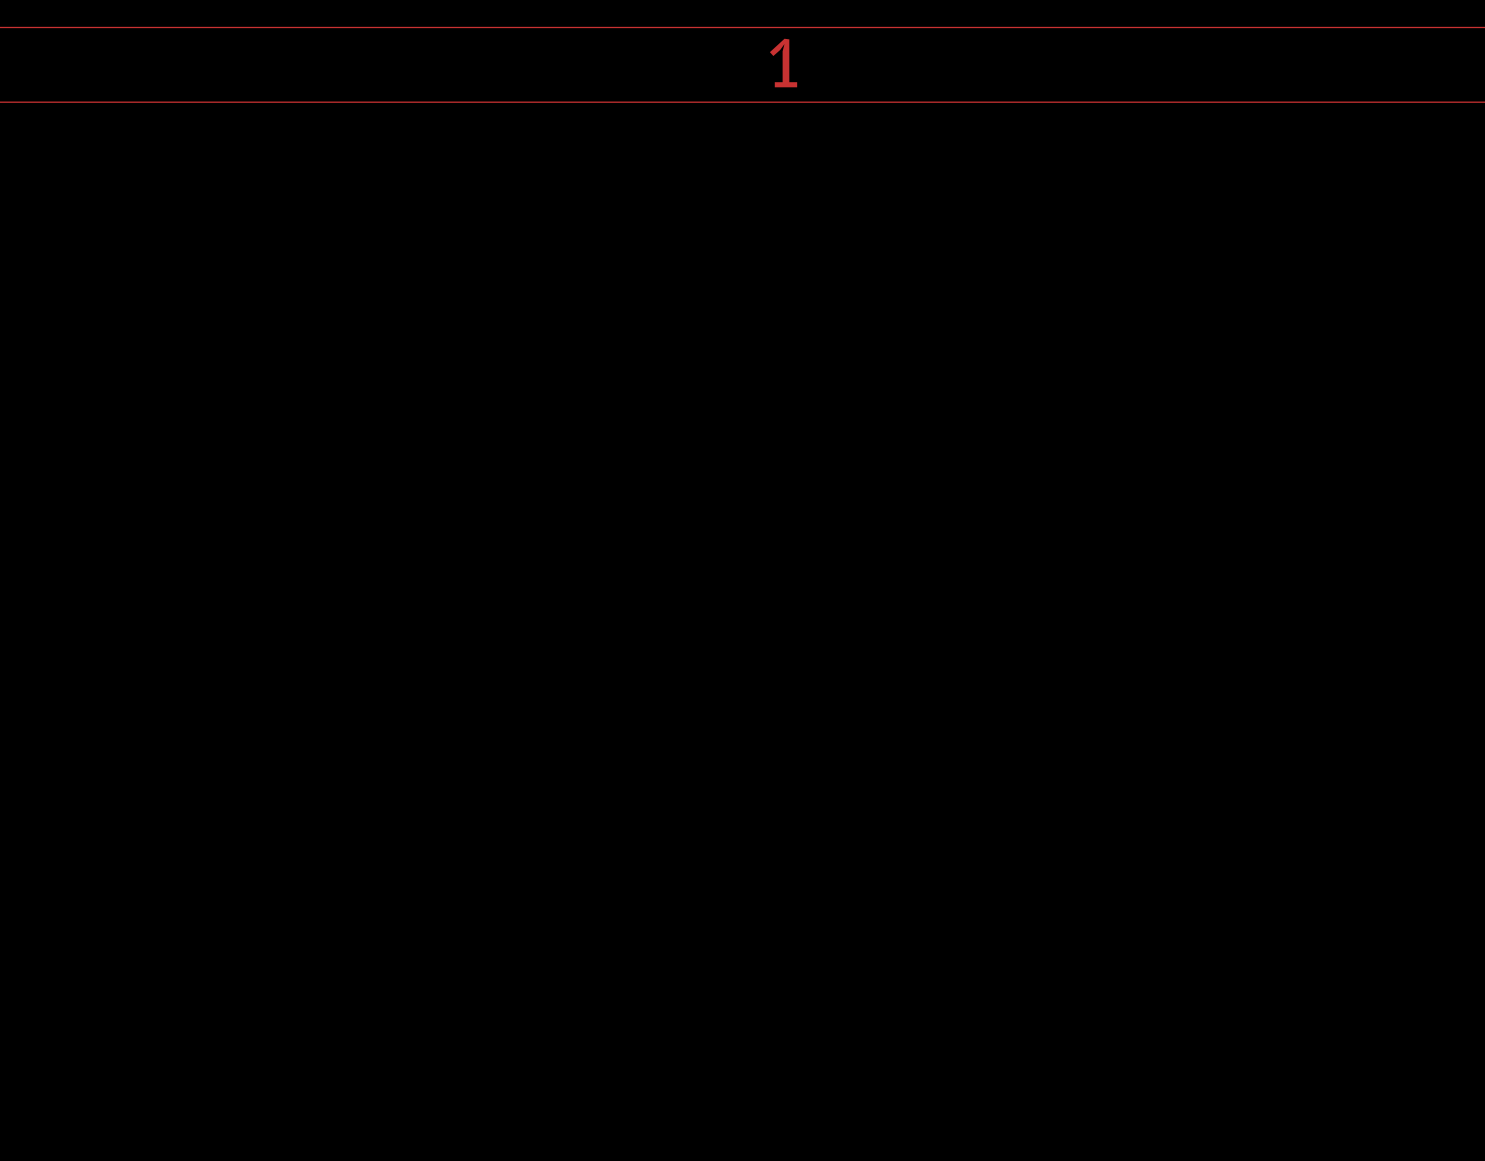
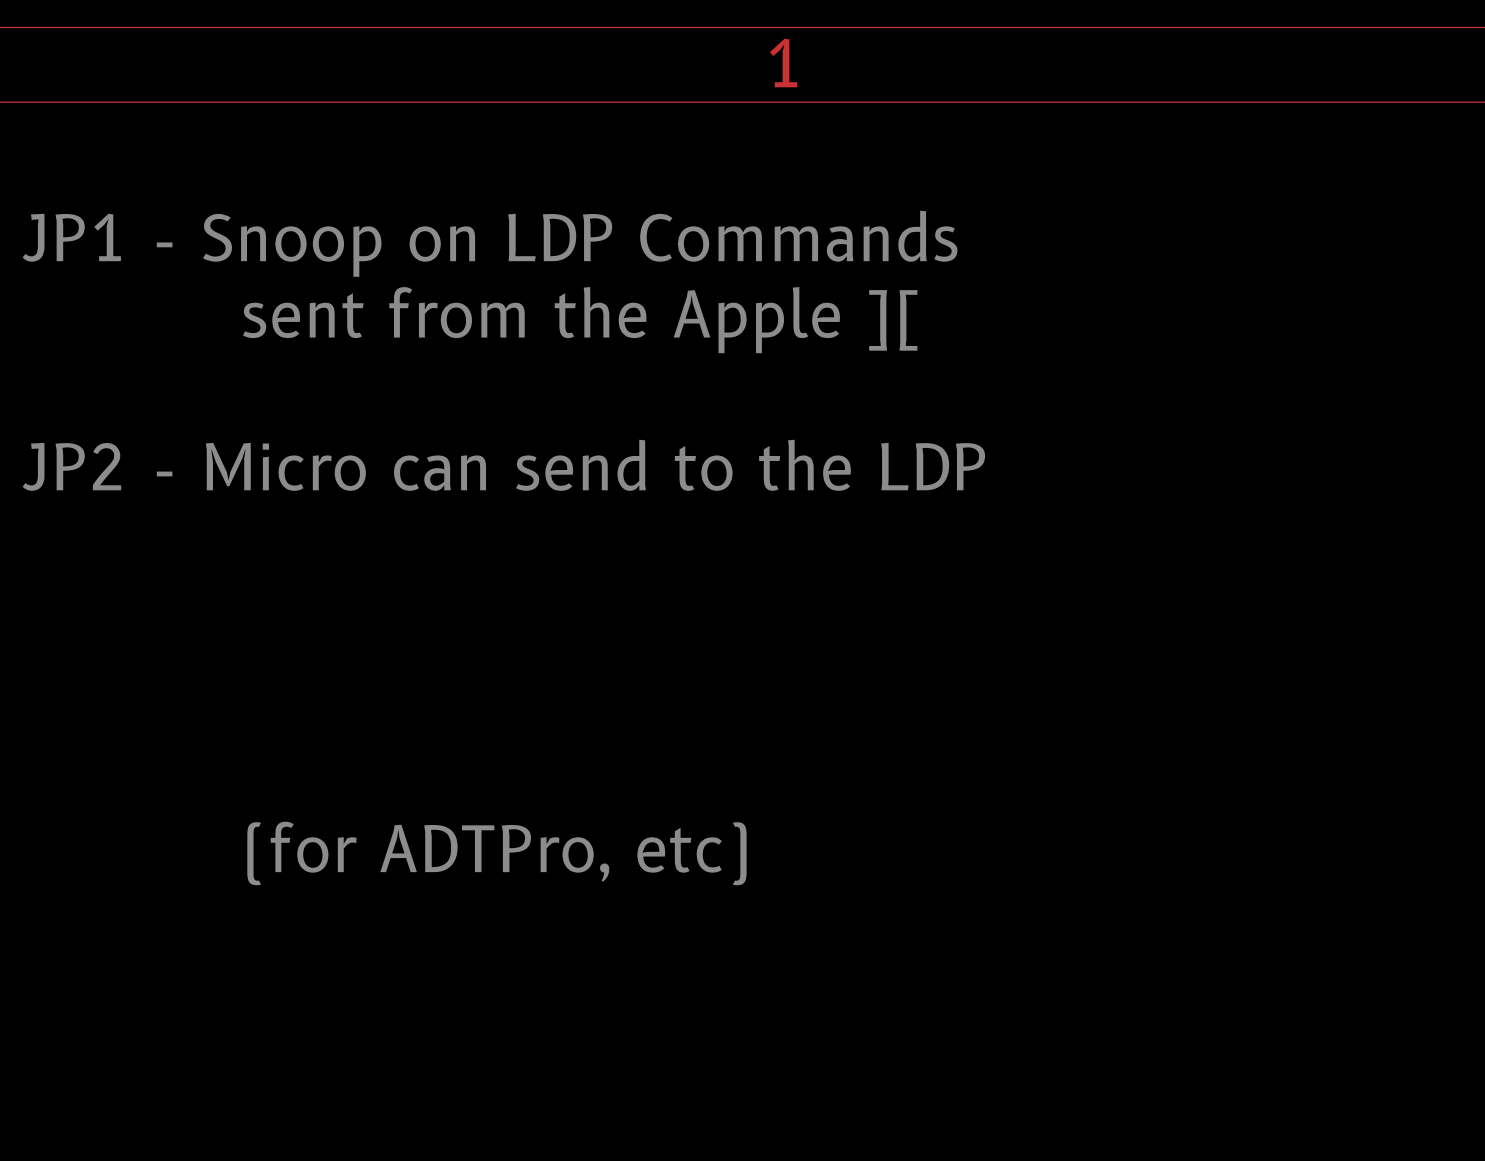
text: none -> JP1 - Snoop on LDP Commands (490, 243)
text: none -> sent from the Apple ][ (580, 320)
text: none -> JP2 - Micro can send to the LDP (503, 465)
text: none -> (for ADTPro, etc) (496, 853)

